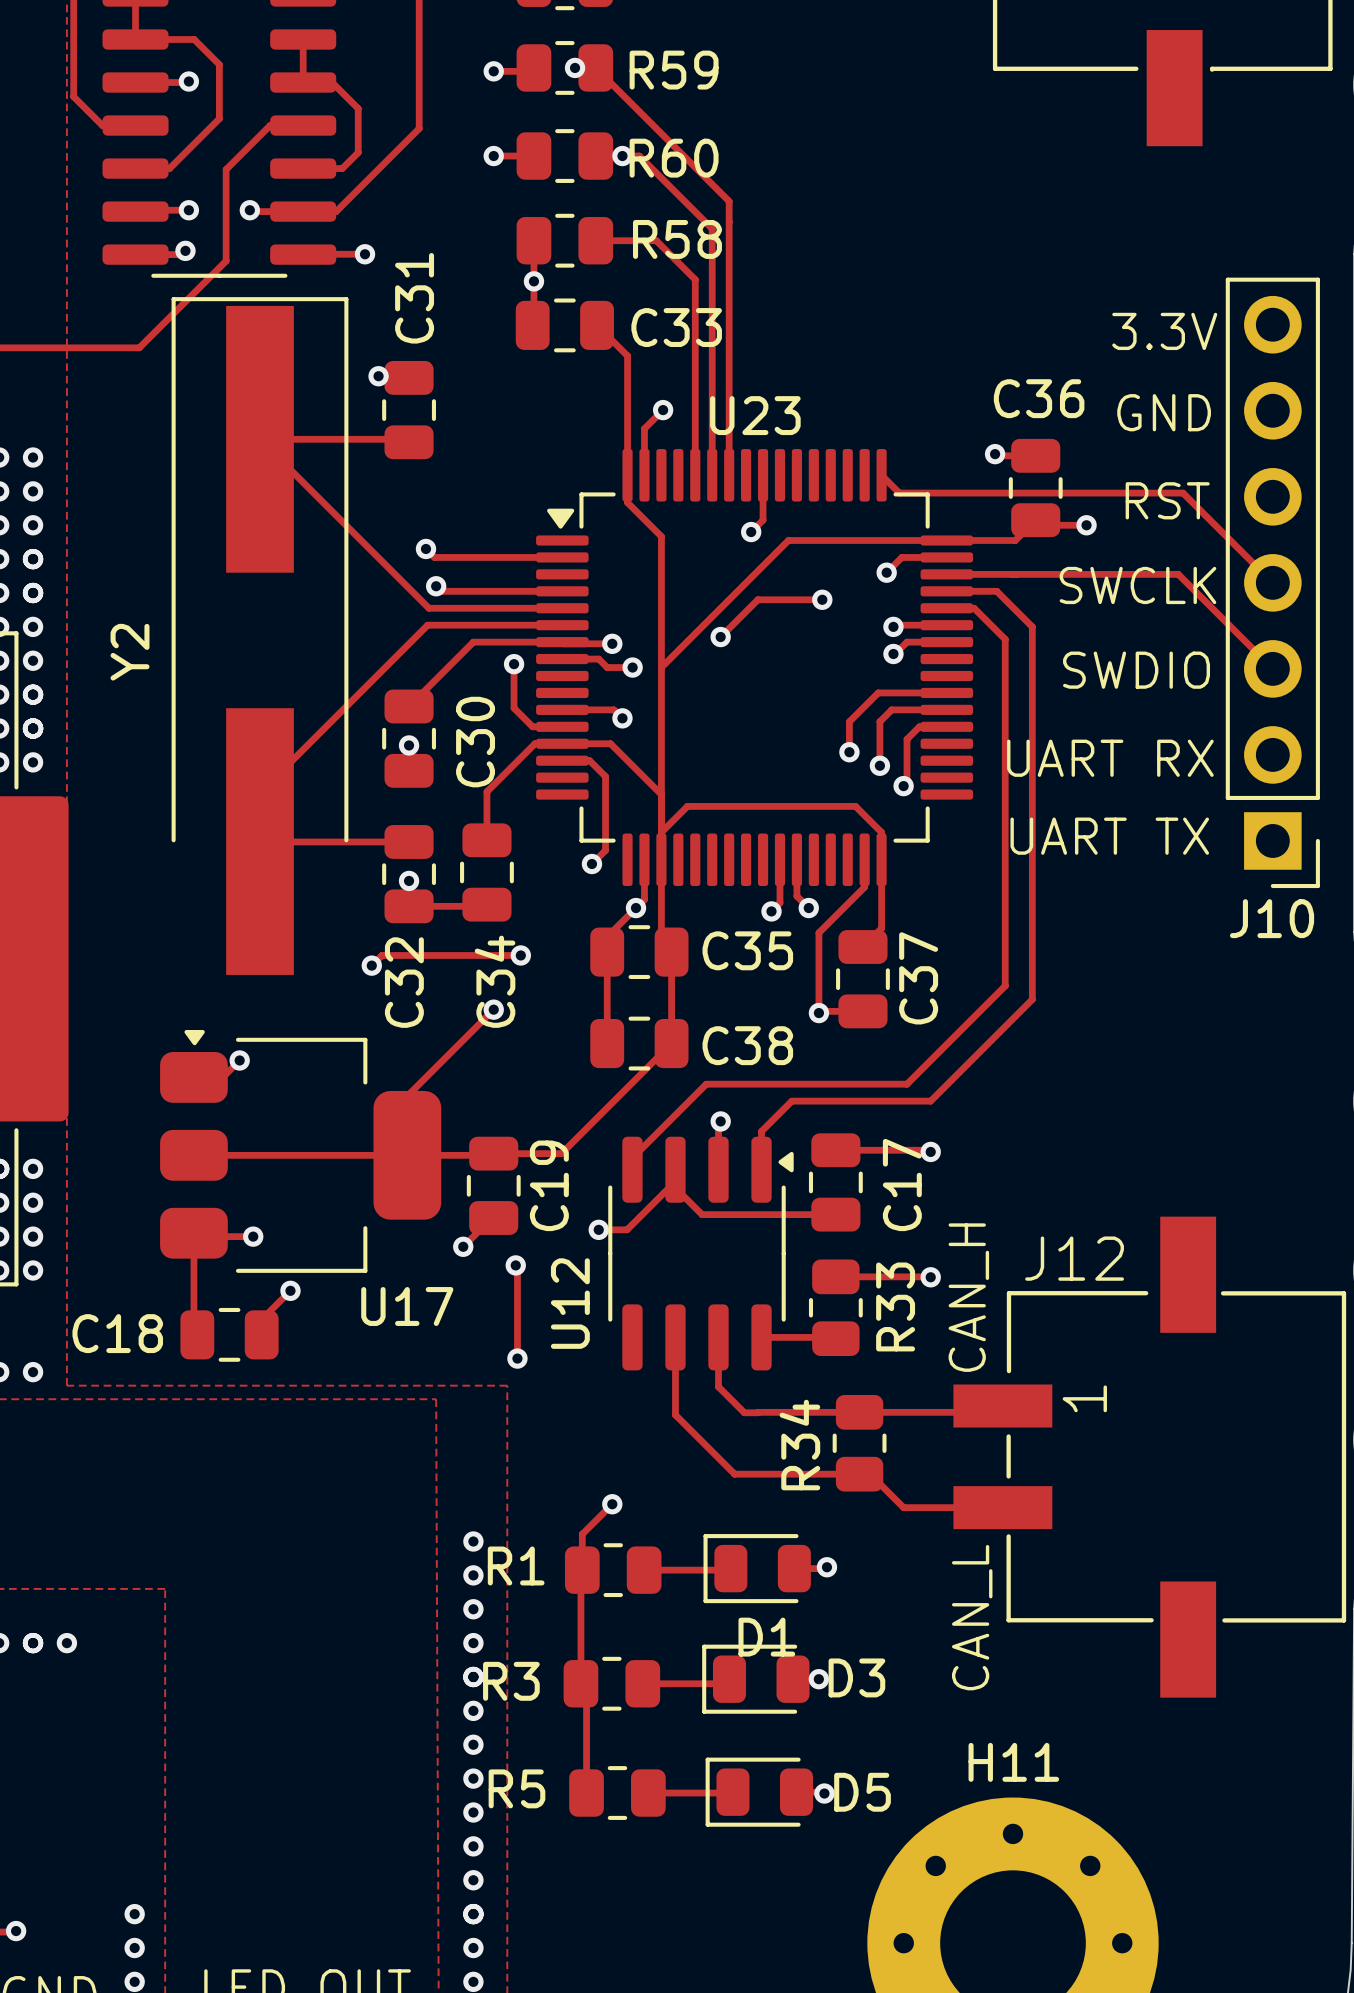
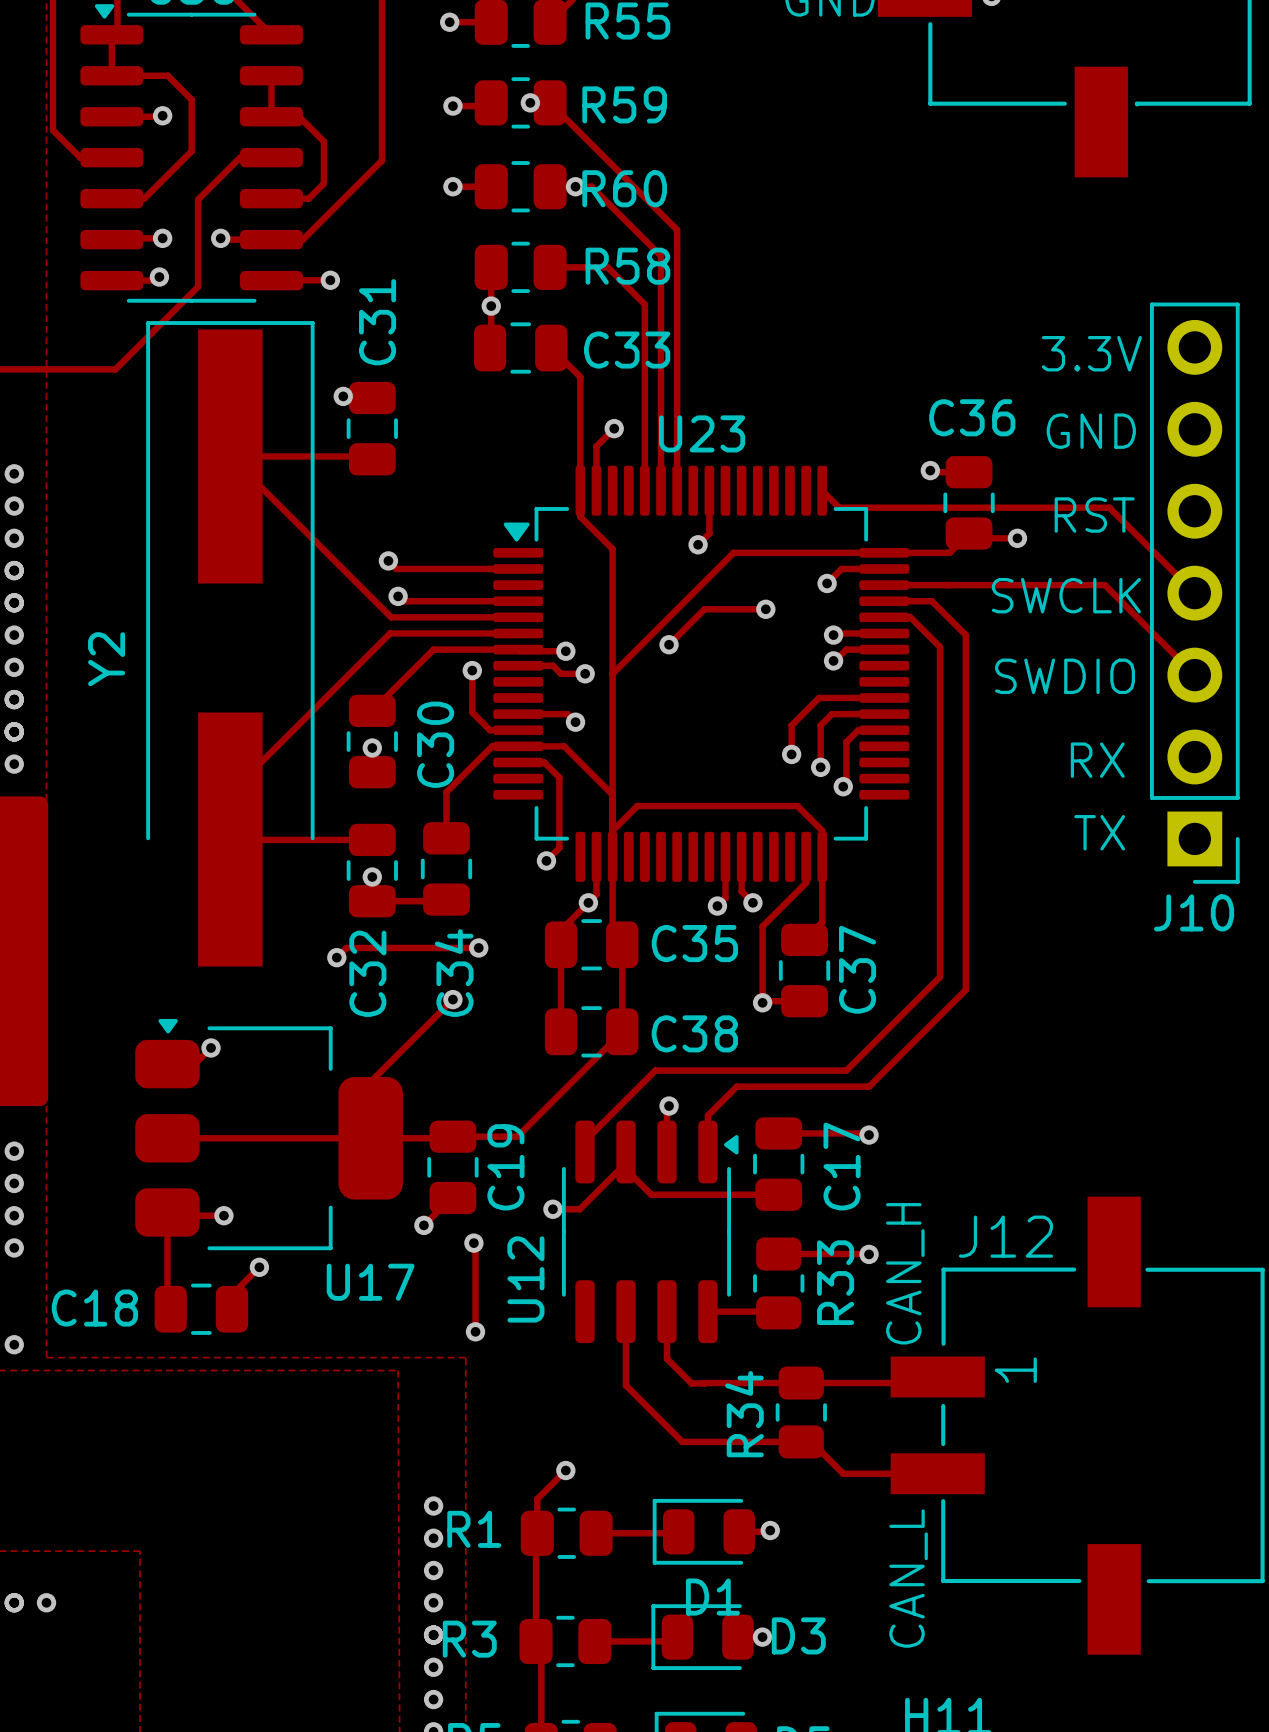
text: UART RX (1110, 758) -> none
text: none -> RX (1097, 760)
text: none -> TX (1099, 832)
text: UART TX (1109, 836) -> none

